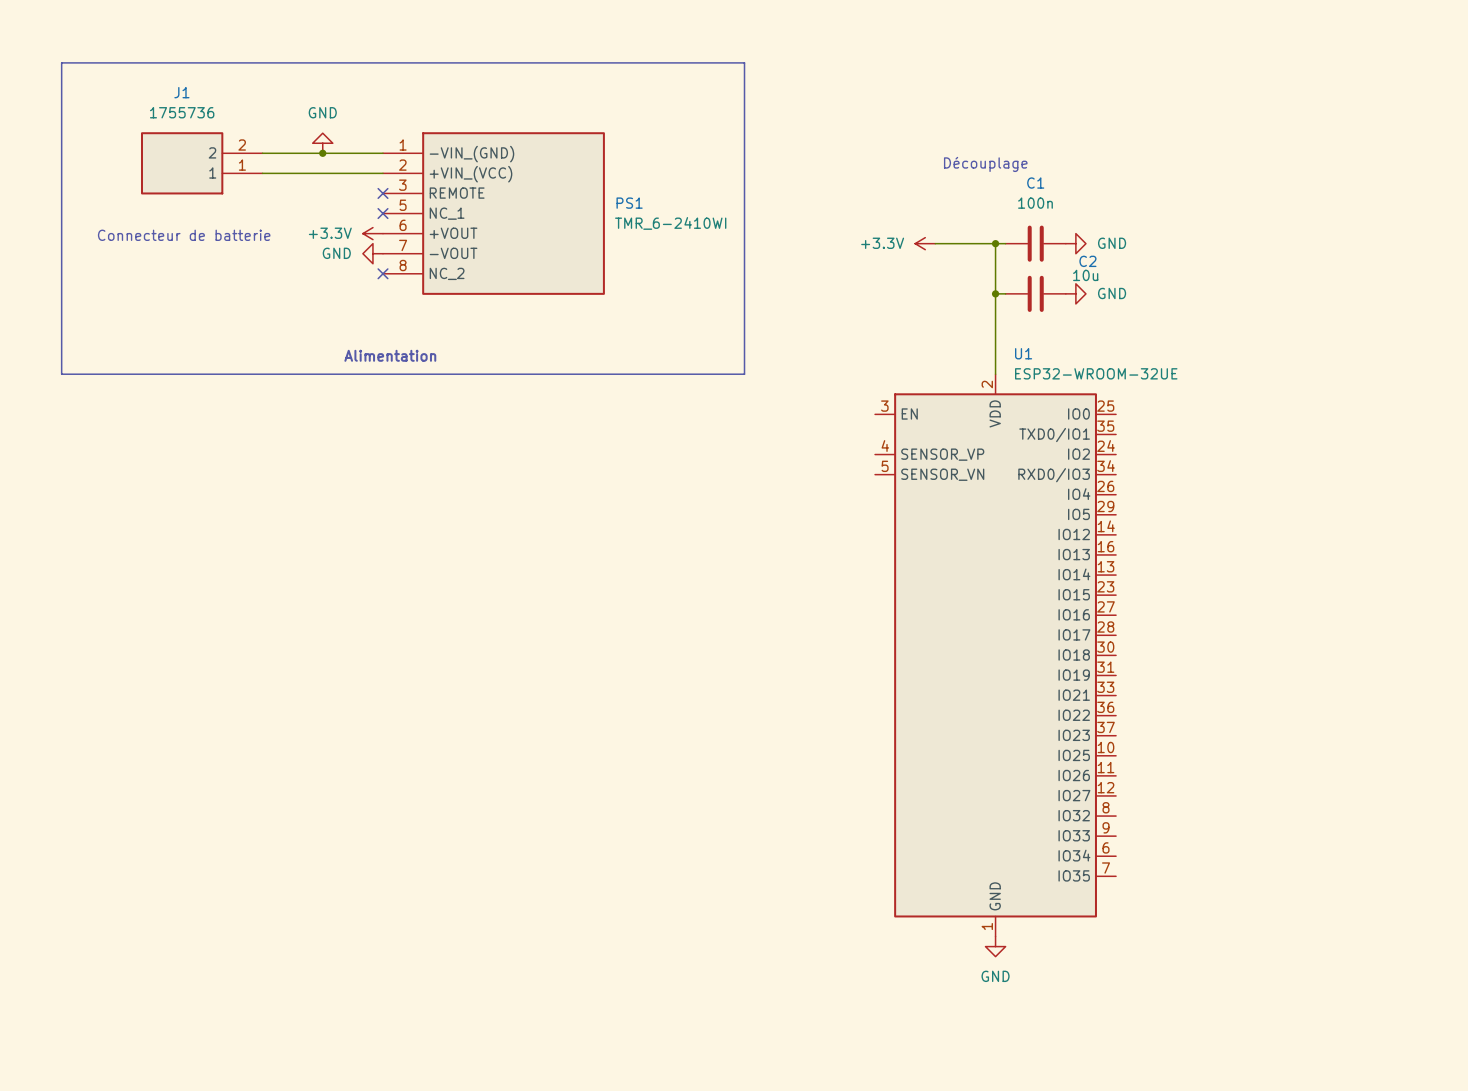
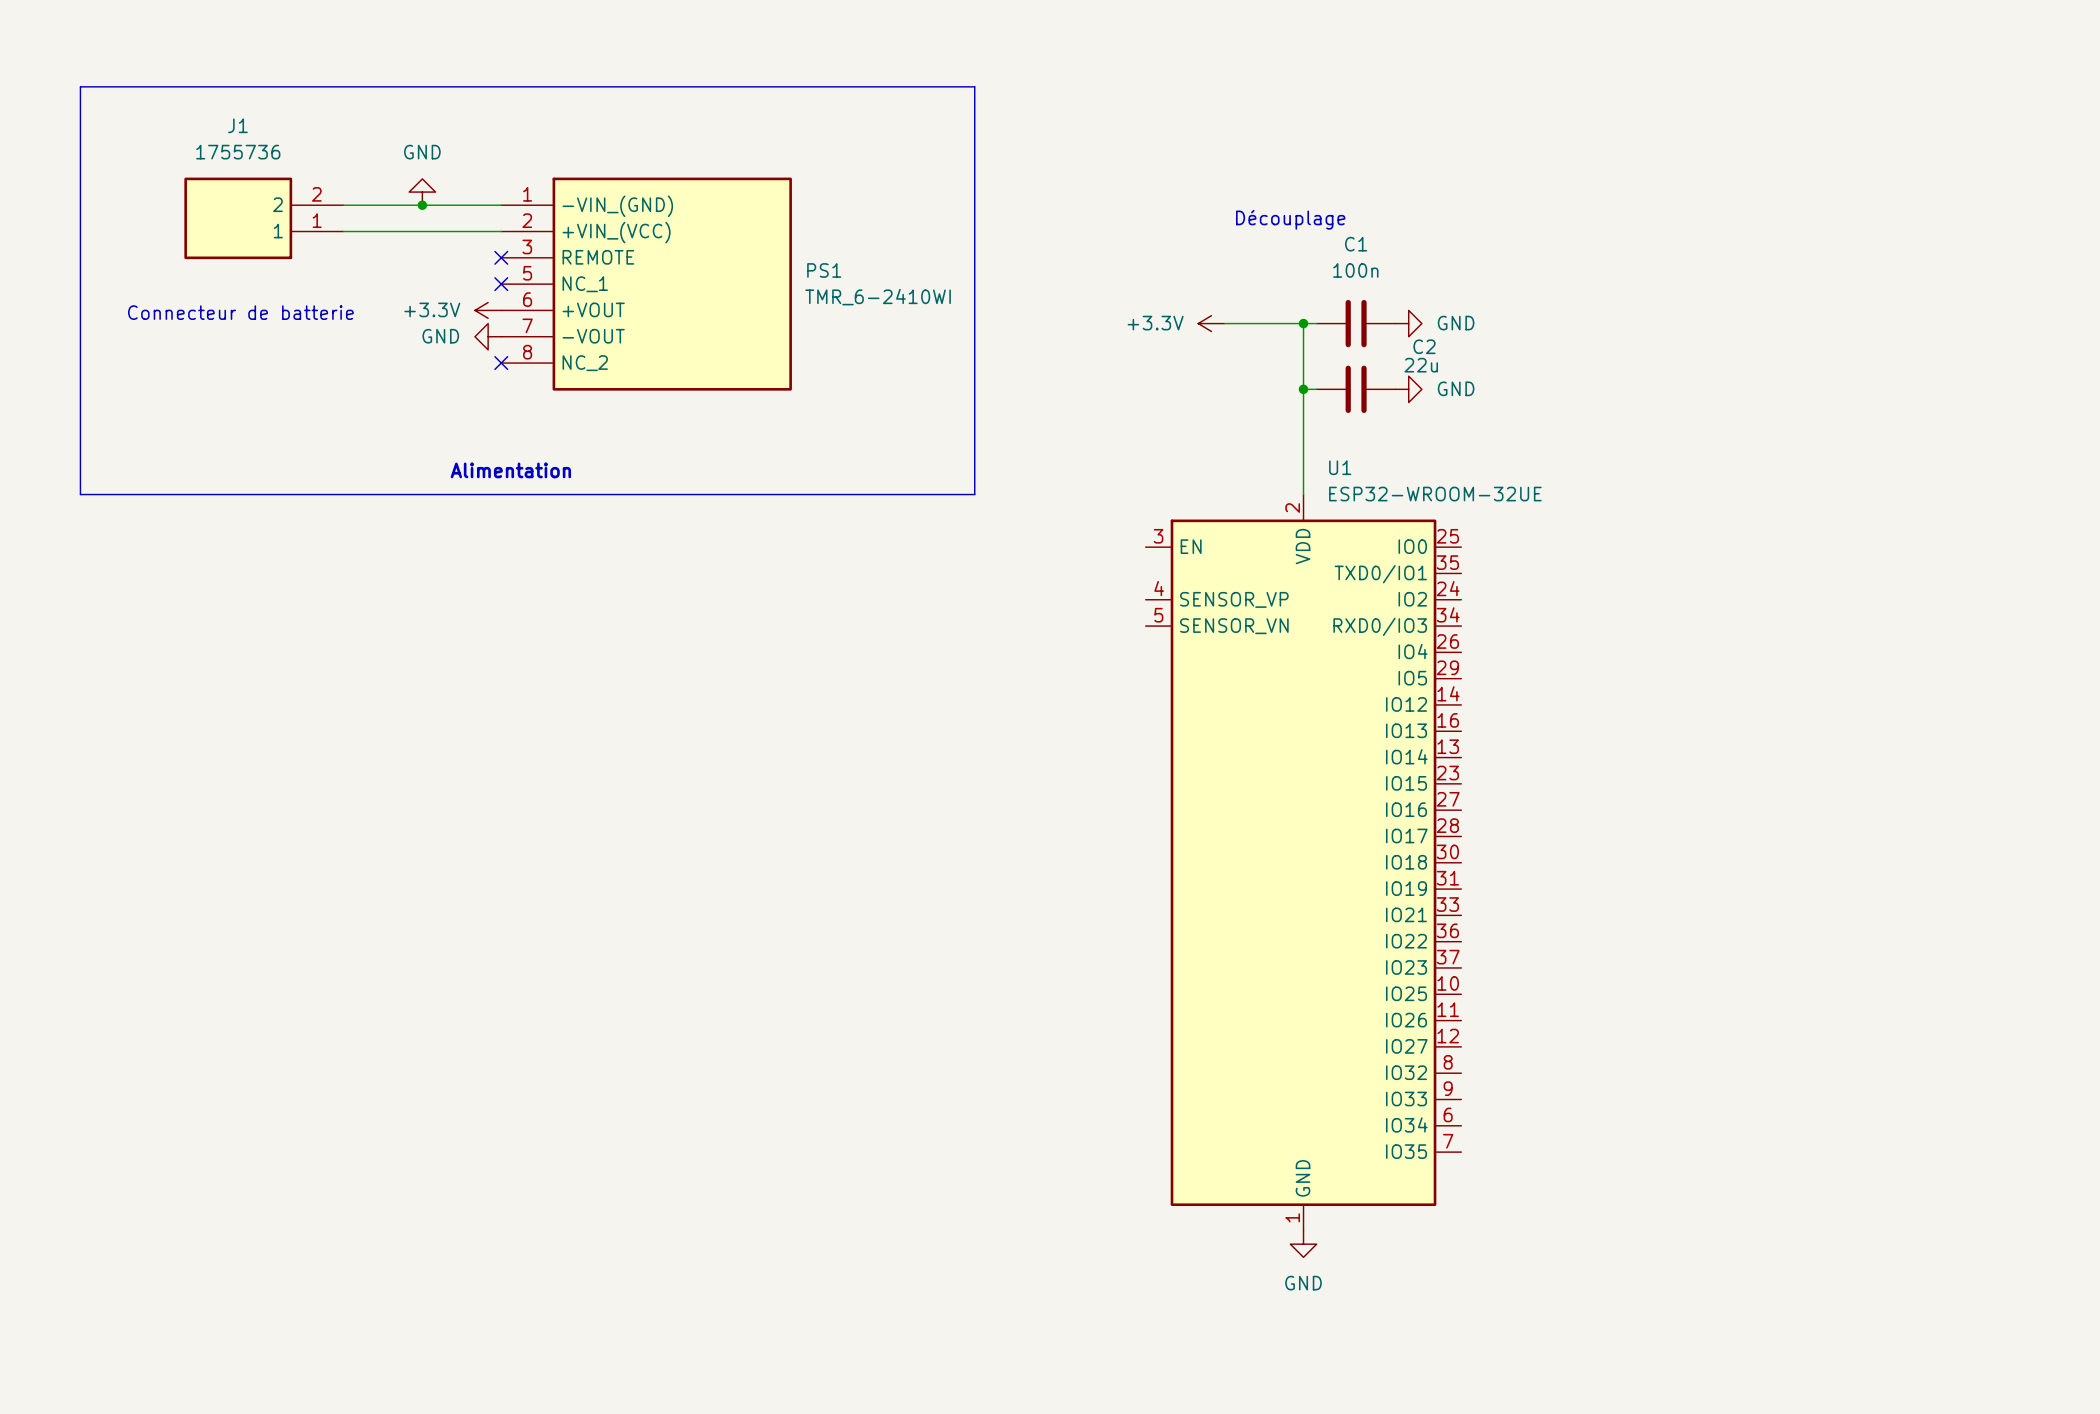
C2 value: 10u (1085, 275) -> 22u (1421, 365)

